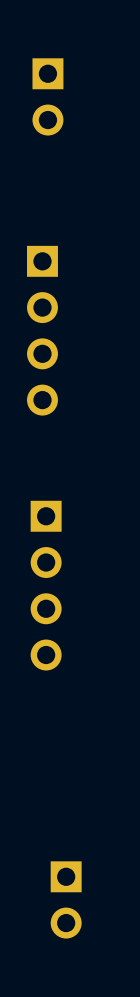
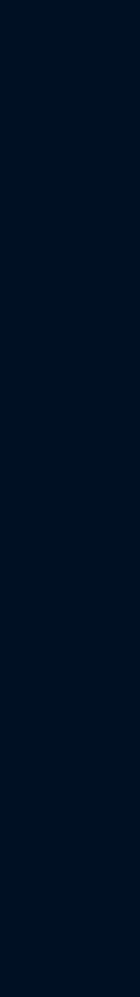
part: (47, 96) -> none
part: (42, 330) -> none
part: (46, 585) -> none
part: (66, 899) -> none

